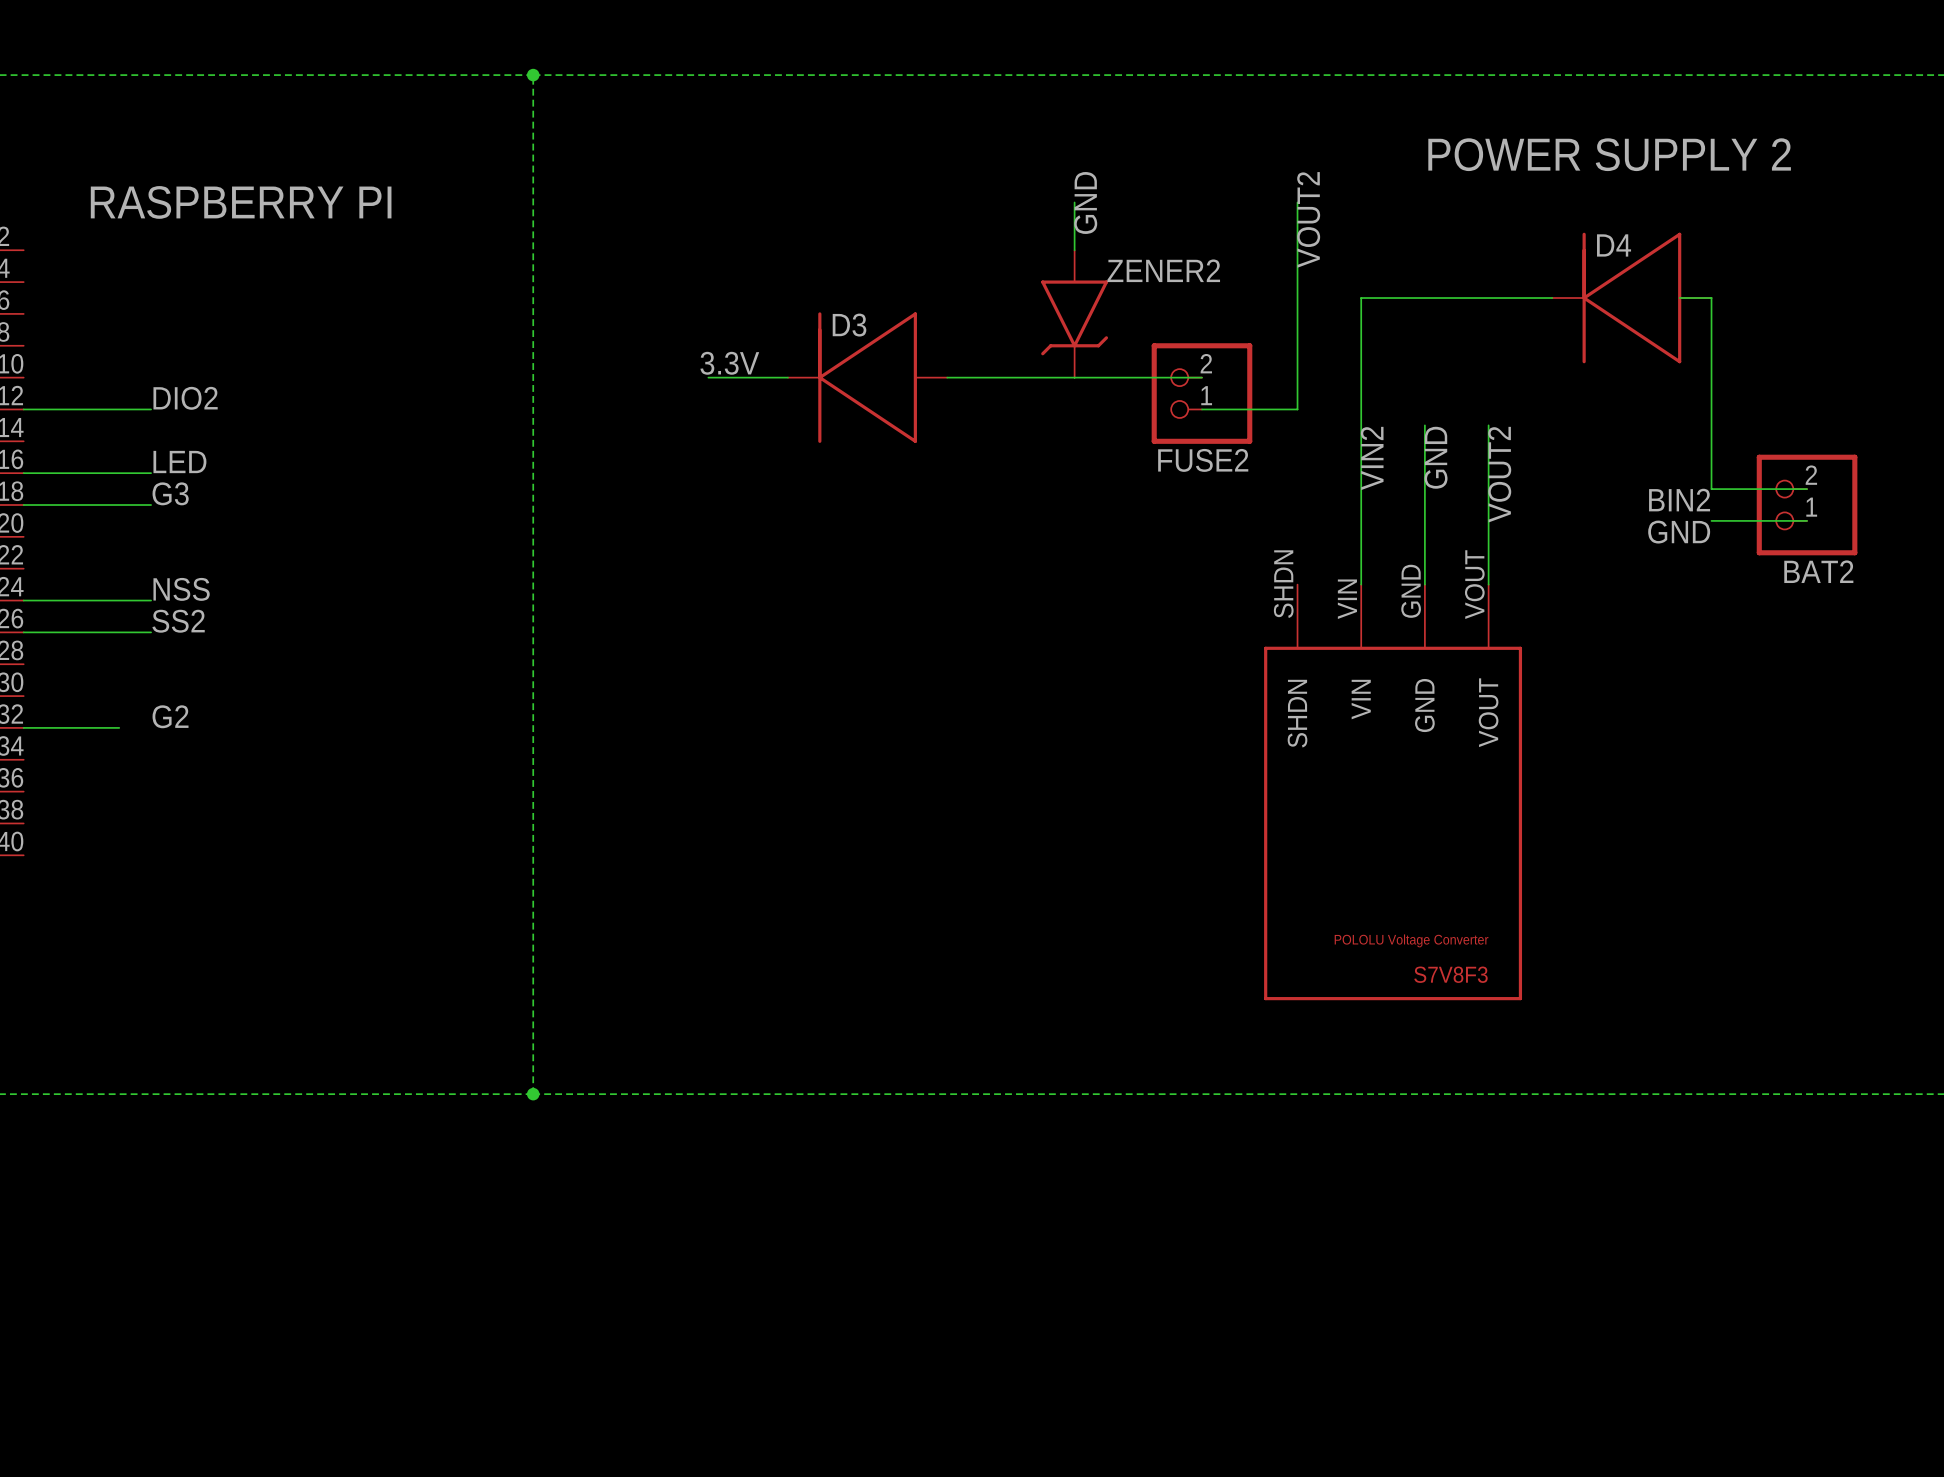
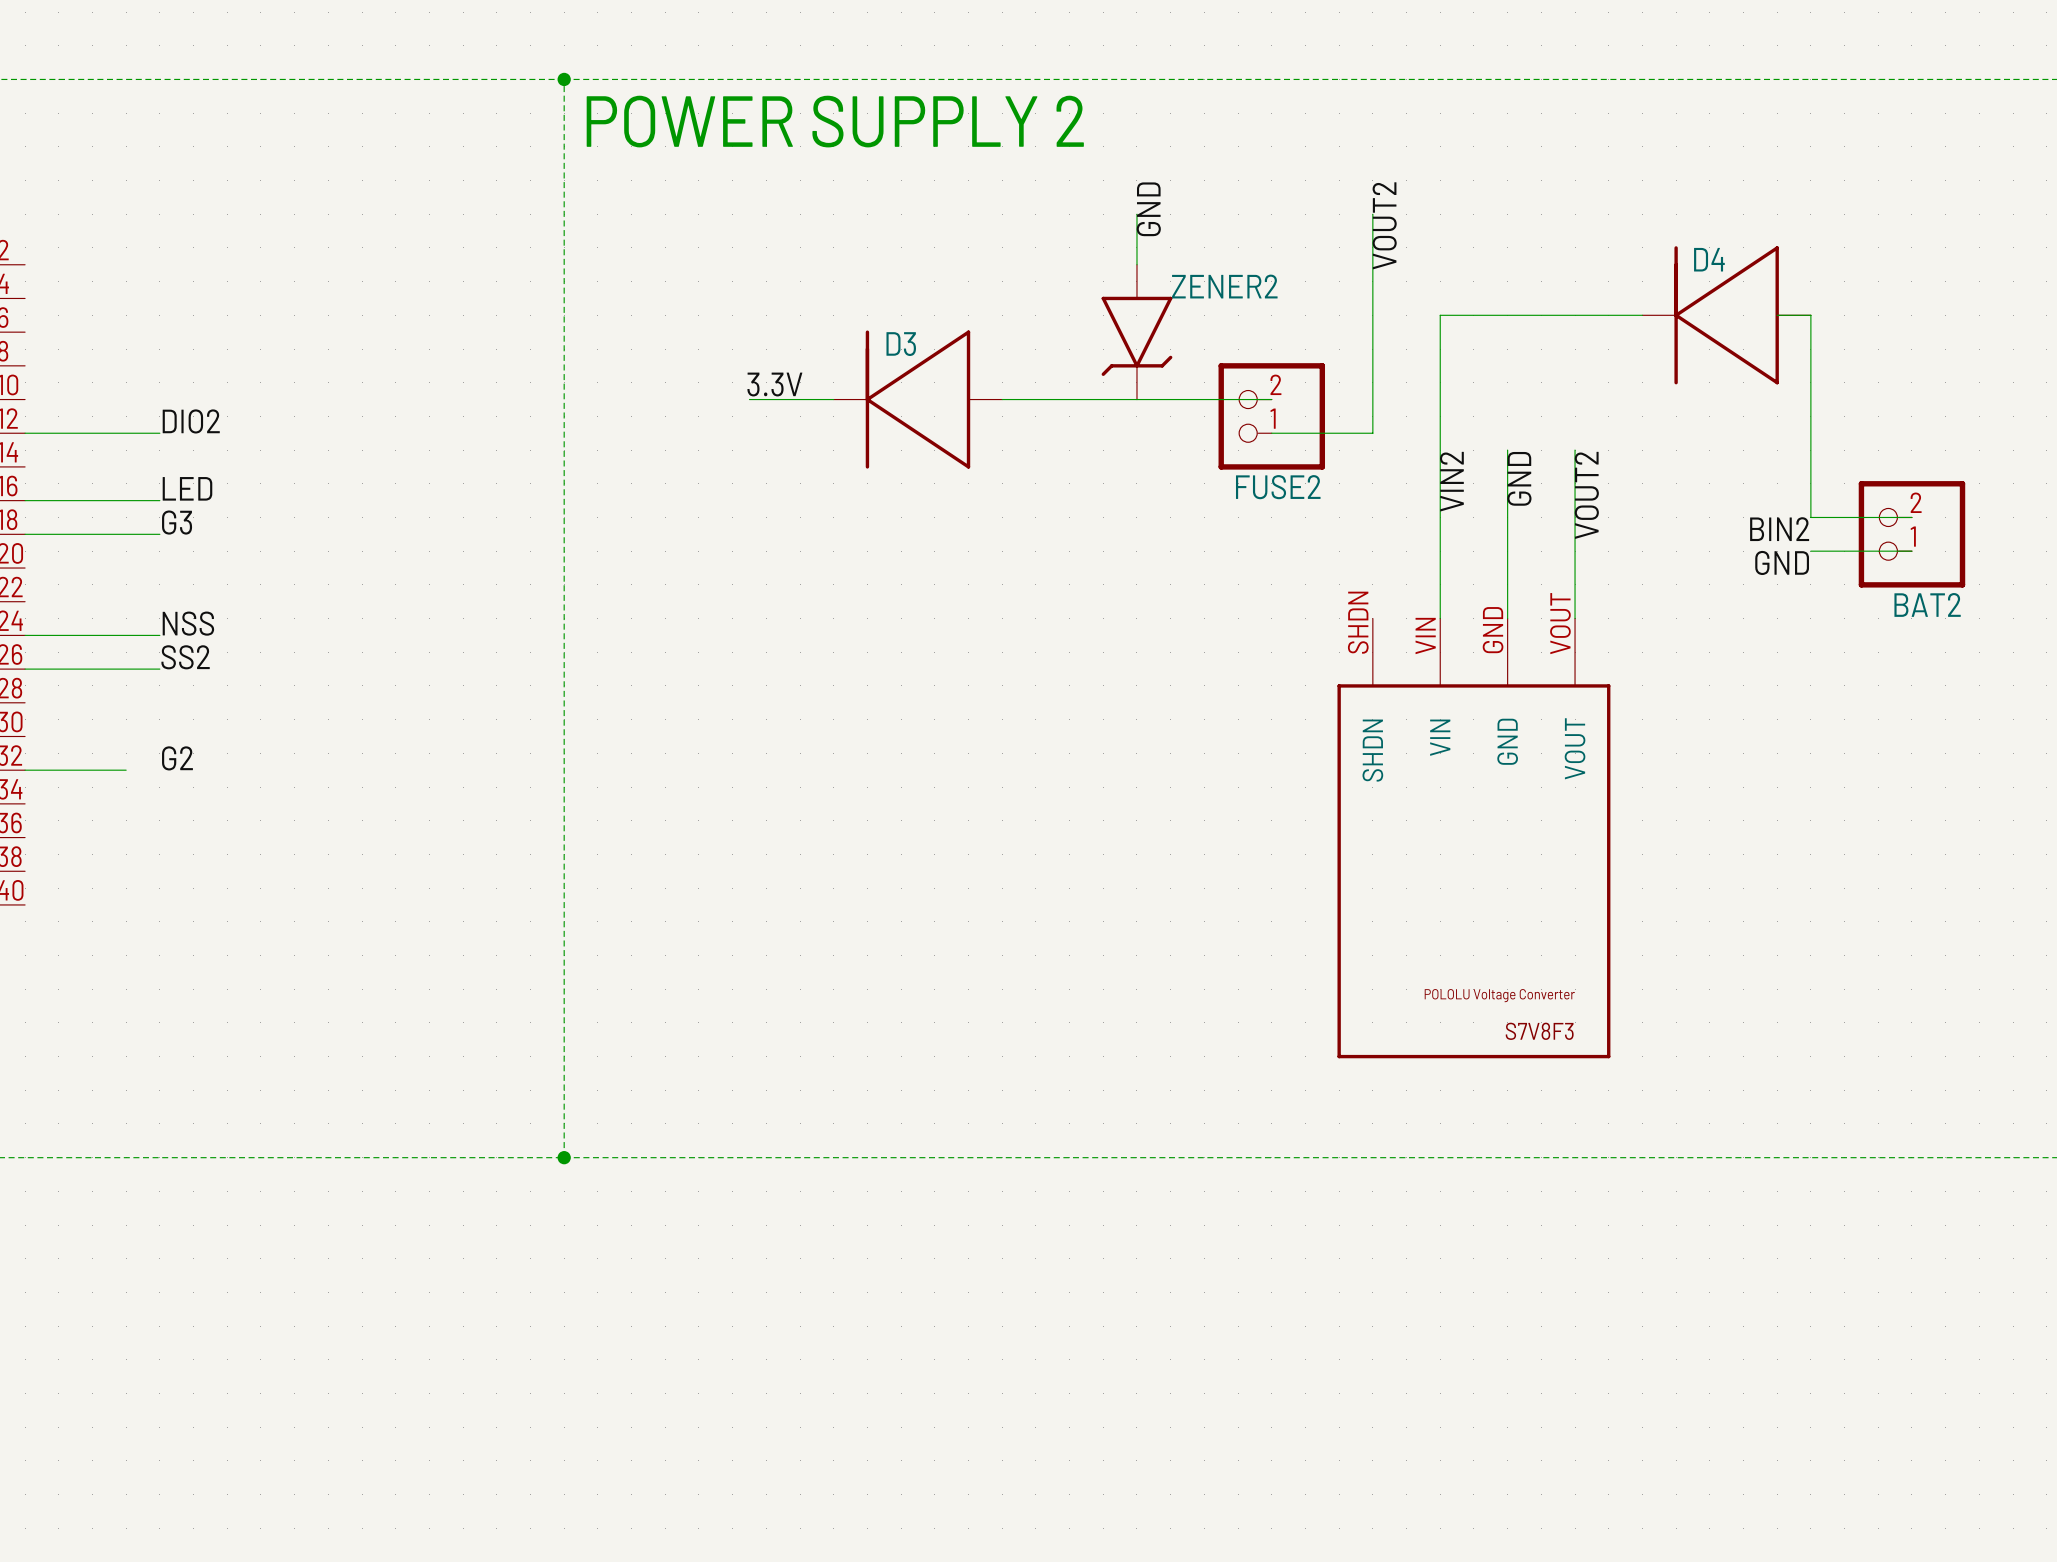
text: none -> POWER SUPPLY 2 (835, 121)
text: POWER SUPPLY 2 (1609, 154) -> none
text: RASPBERRY PI (241, 202) -> none

